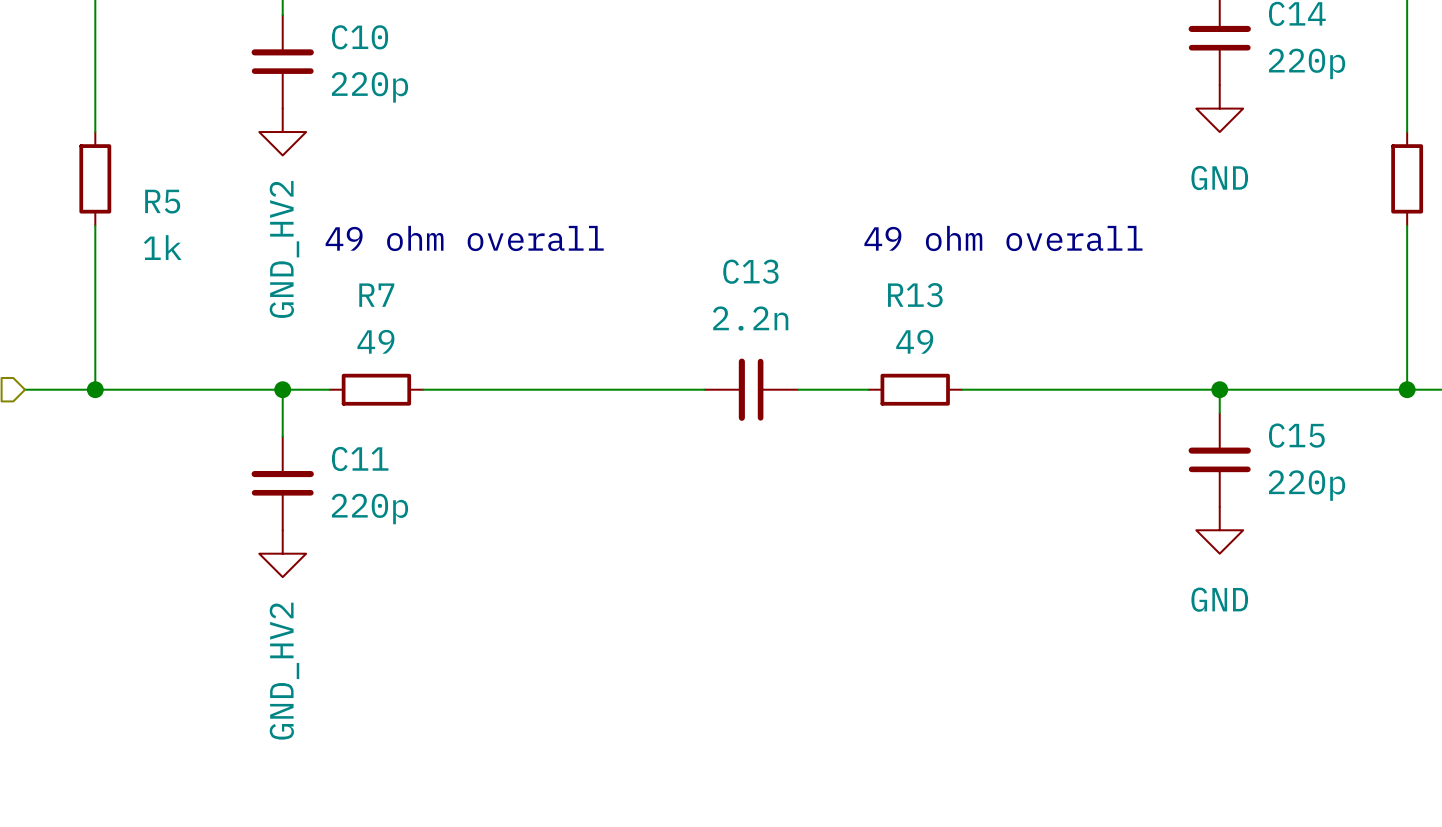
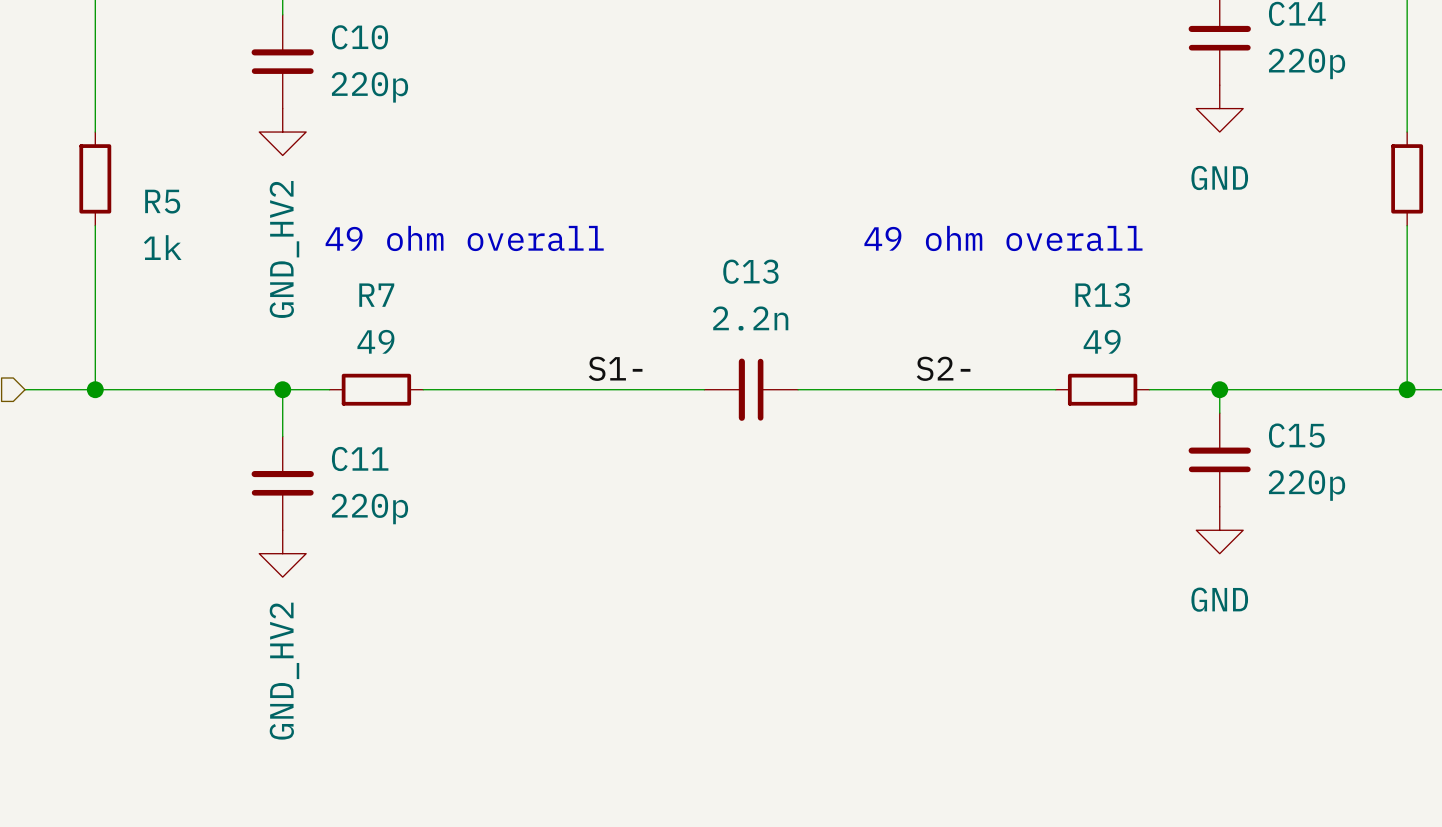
label: none -> S1- (615, 368)
label: none -> S2- (943, 368)
R13 position: (915, 389) -> (1102, 389)
wire: (1055, 389) (1149, 389) -> (868, 389) (962, 389)

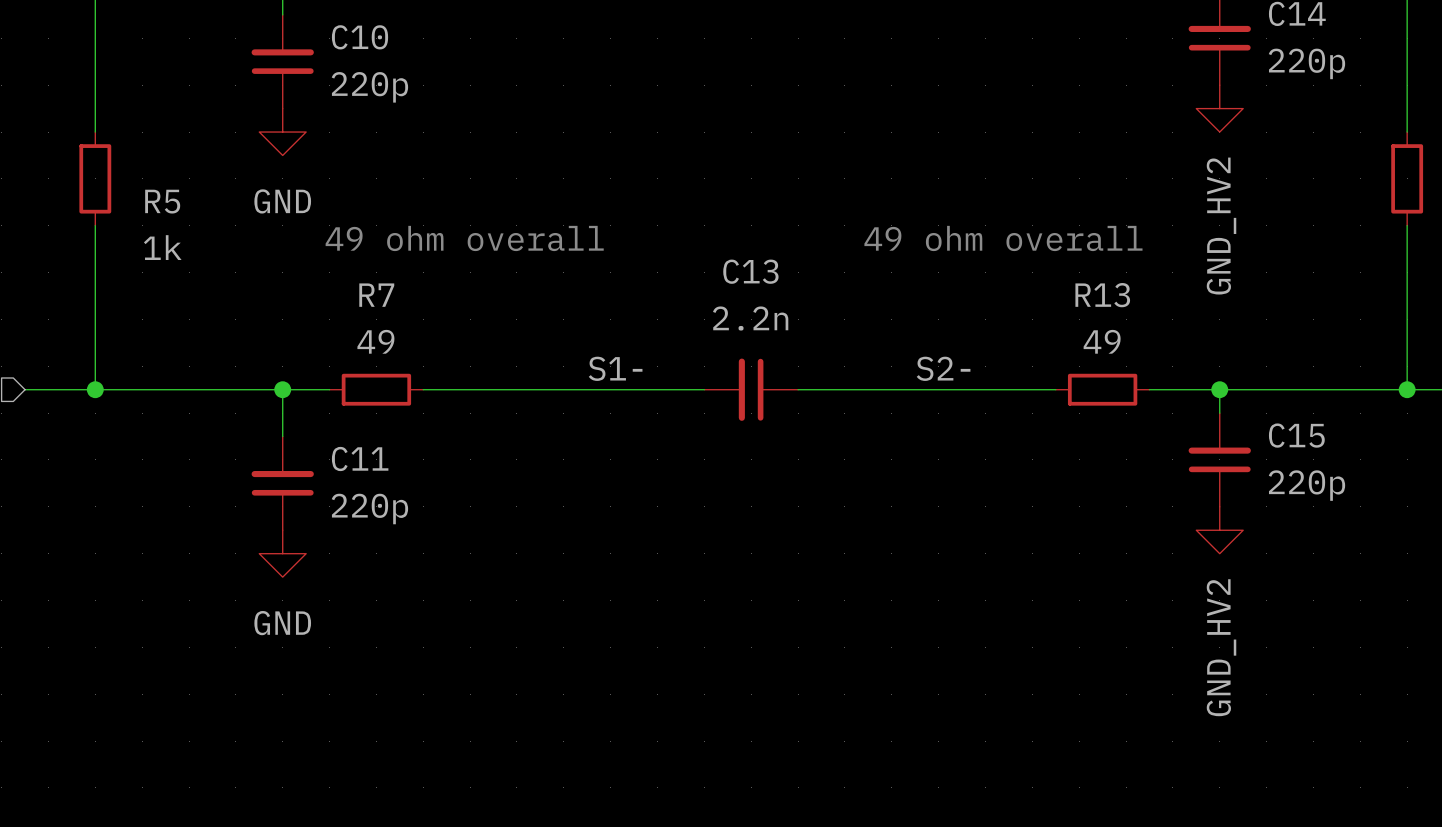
power symbol: GND (1219, 108) -> GND_HV2 (1219, 108)
power symbol: GND_HV2 (282, 132) -> GND (282, 132)
power symbol: GND (1219, 530) -> GND_HV2 (1219, 530)
power symbol: GND_HV2 (282, 553) -> GND (282, 553)

